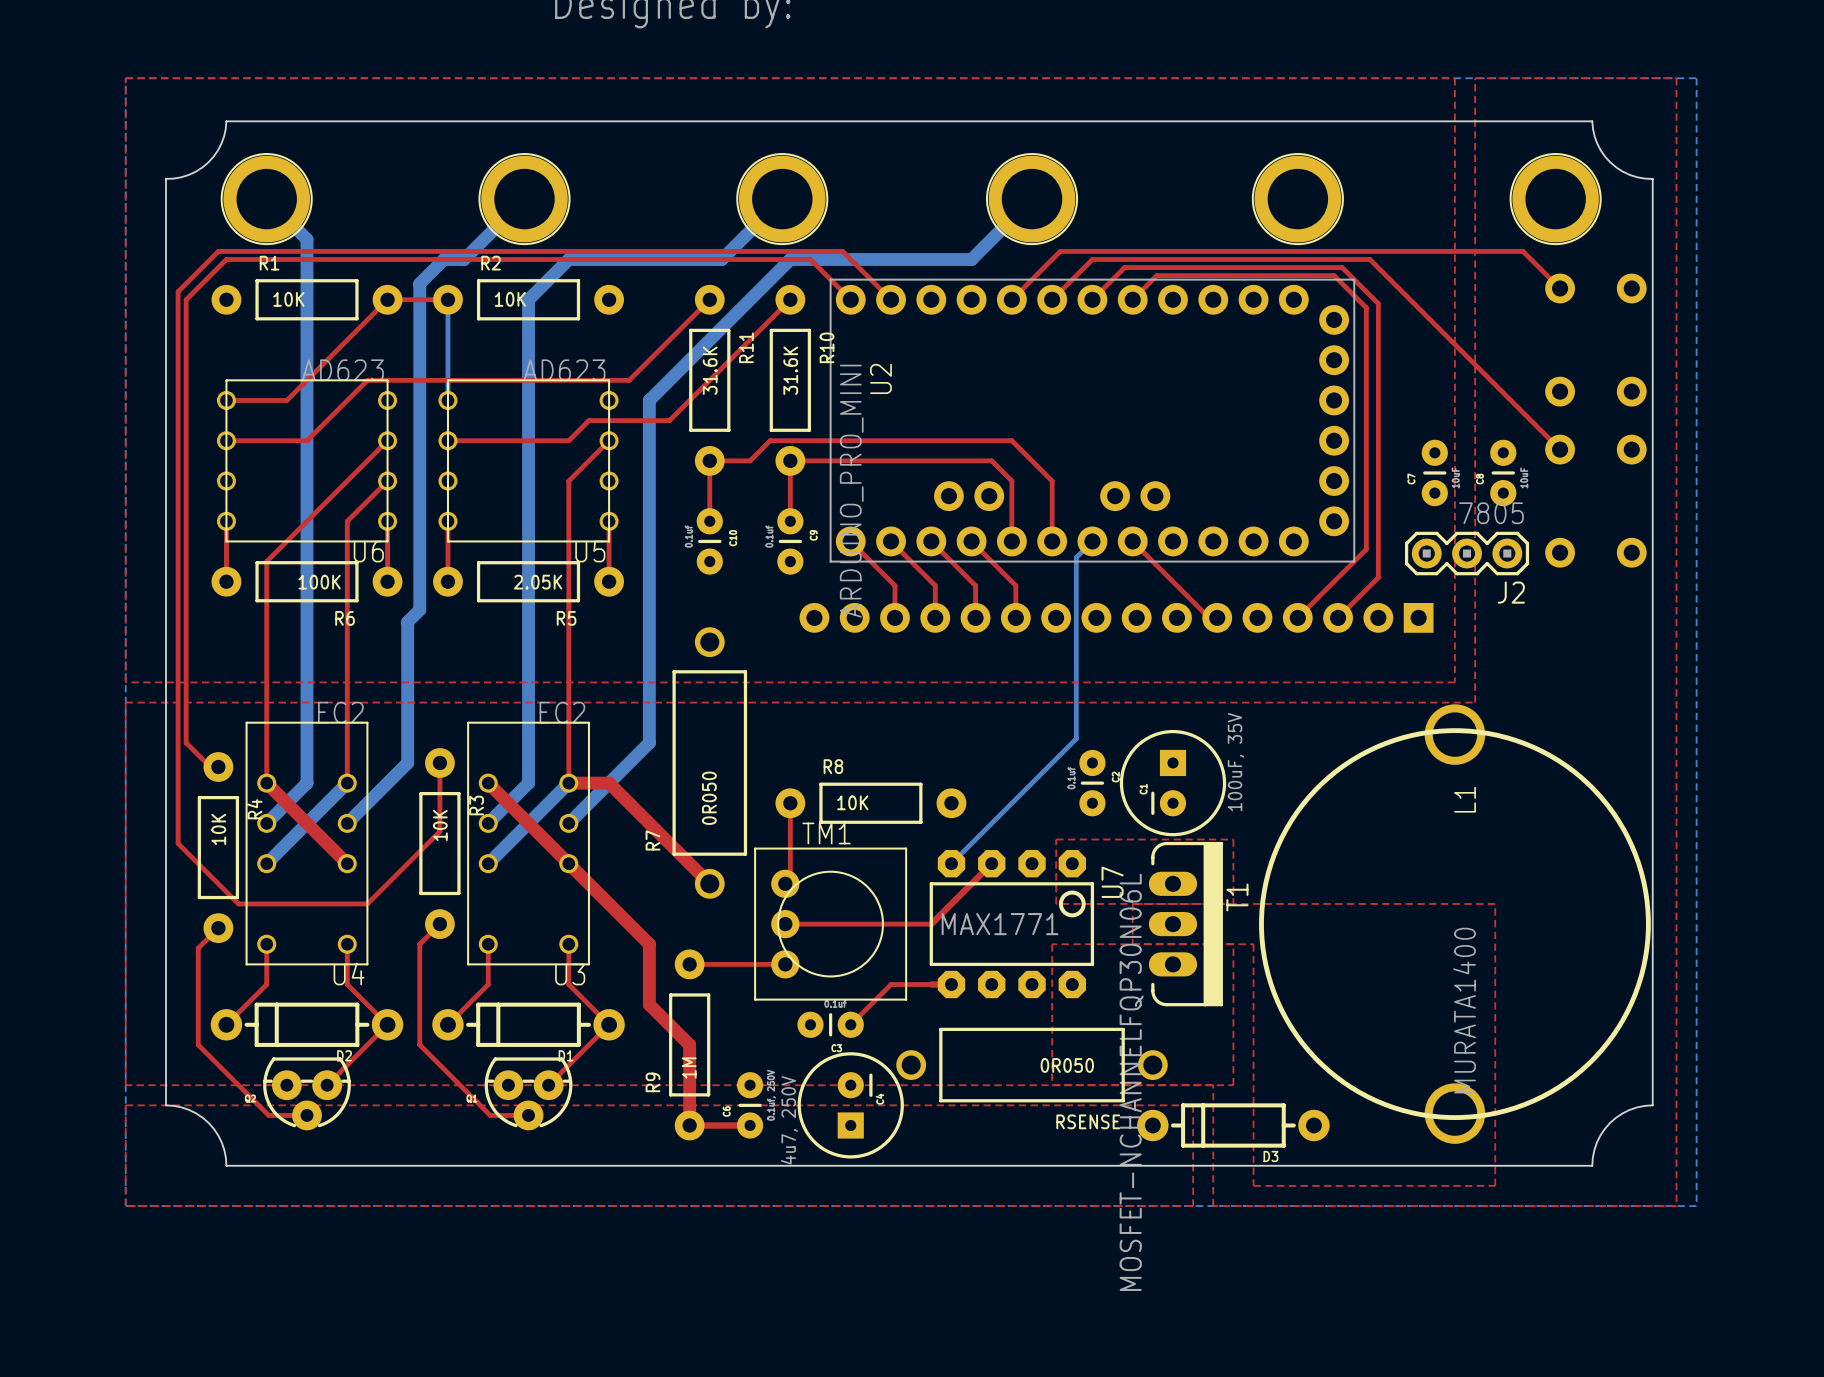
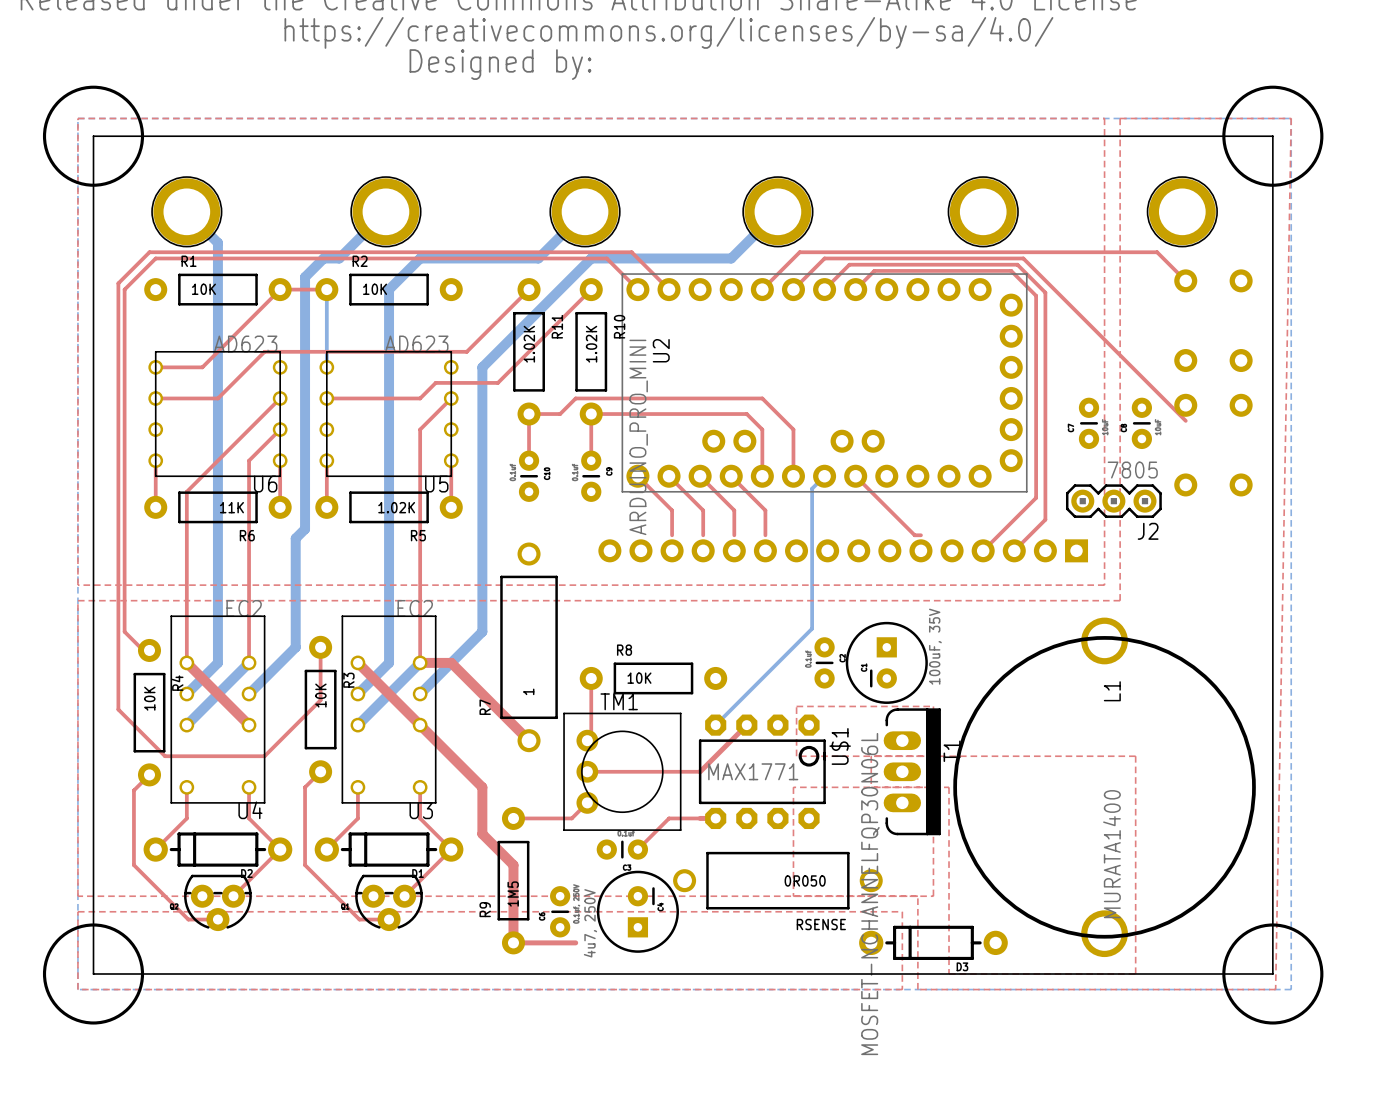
round board edge: none -> [42, 85, 145, 187]
round board edge: none -> [1222, 85, 1324, 187]
top zone outline: (1676, 78) (1676, 1206) -> (1275, 118) (1291, 118) (1275, 989)
board edge: (226, 121) (1592, 121) (1597, 143) (1610, 162) (1630, 174) (1652, 178) (1652, 1105) (1629, 1109) (1609, 1123) (1596, 1142) (1592, 1165) (226, 1165) (221, 1142) (208, 1123) (189, 1109) (166, 1105) (166, 178) (188, 174) (208, 162) (221, 143) (226, 121) -> (93, 136) (93, 973) (1272, 973) (1272, 136) (93, 136)
top track: (1349, 259) (1369, 259) (1560, 449) -> (1023, 258) (1185, 420)
R11 value: 31.6K (710, 370) -> 1.02K (529, 344)
R10 value: 31.6K (790, 370) -> 1.02K (591, 344)
top track: (1366, 549) (1297, 617) -> (1036, 482) (1036, 497) (983, 550)
J2 position: (1467, 553) -> (1113, 501)
top track: (1378, 577) (1338, 617) -> (1045, 504) (1045, 519) (1014, 550)
R6 value: 100K (319, 582) -> 11K (231, 507)
R5 value: 2.05K (538, 582) -> 1.02K (396, 507)
part position: (1116, 617) -> (843, 550)
R7 value: 0R050 (709, 798) -> 1 (528, 691)
U7 name: U7 (1112, 882) -> U$1 (840, 746)
top zone outline: (1132, 903) (1132, 944) -> (871, 756) (871, 787)
T1 position: (1185, 924) -> (912, 771)
L1 position: (1454, 924) -> (1104, 787)
top track: (689, 964) (785, 964) -> (513, 818) (571, 818) (587, 802)
R9 position: (689, 1044) -> (513, 880)
R9 value: 1M (689, 1068) -> 1M5 (513, 894)
round board edge: none -> [42, 923, 145, 1025]
round board edge: none -> [1222, 923, 1324, 1025]
top track: (689, 1125) (750, 1125) -> (513, 927) (513, 942) (575, 942)
D3 position: (1233, 1125) -> (933, 942)

